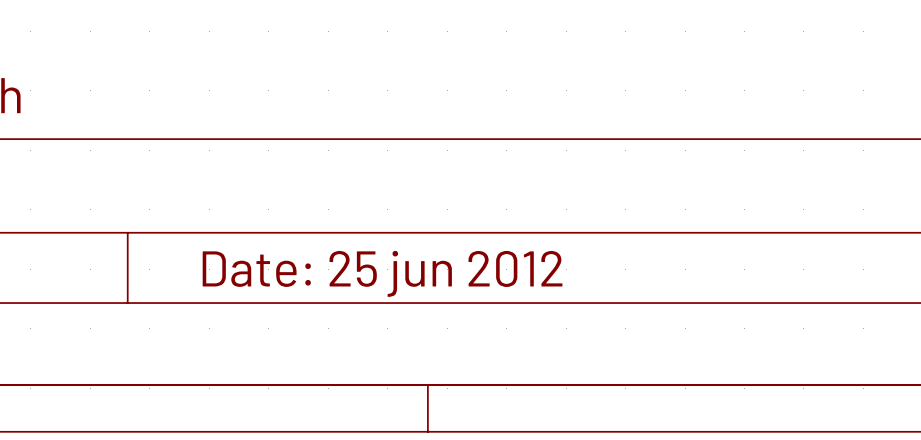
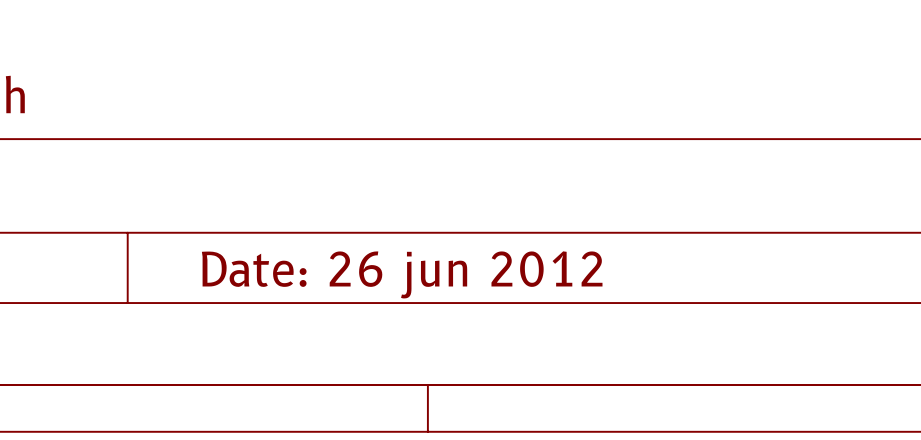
title block: Date: 25 jun 2012 (382, 273) -> Date: 26 jun 2012 (402, 274)

